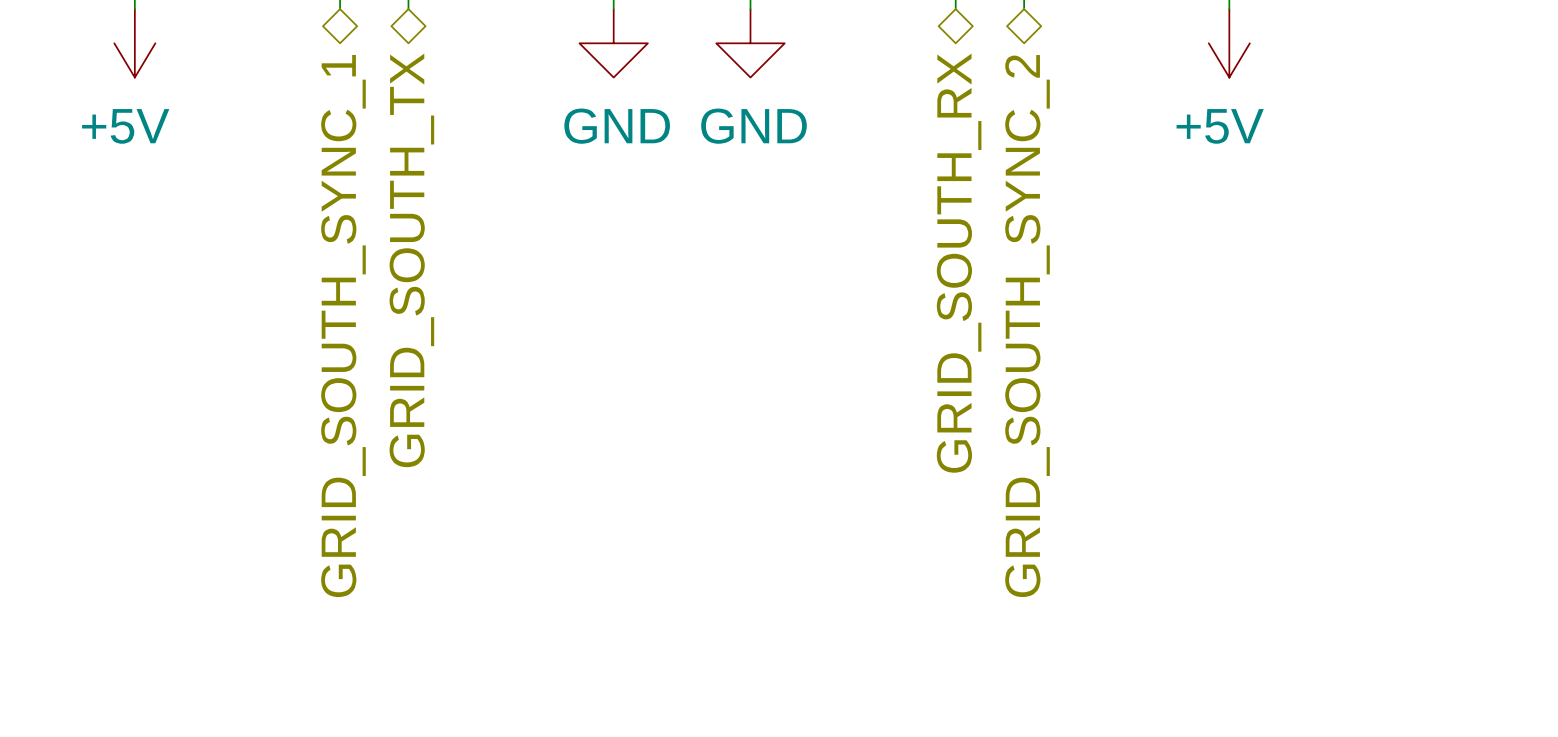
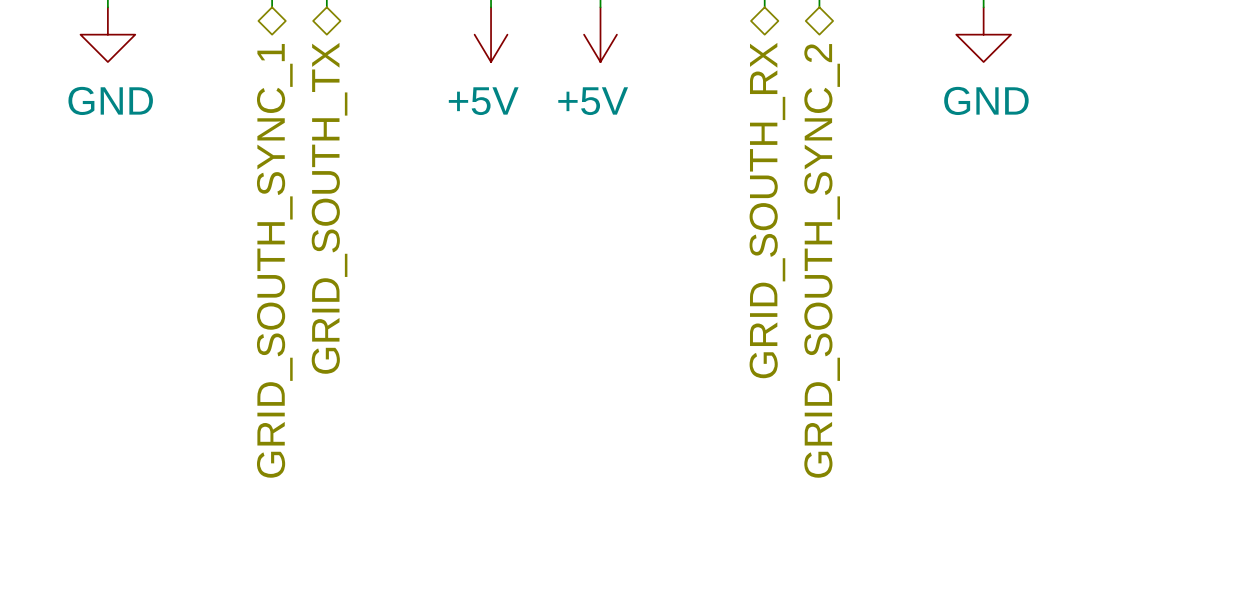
power symbol: +5V (134, 43) -> GND (107, 34)
power symbol: GND (613, 43) -> +5V (491, 34)
power symbol: GND (750, 43) -> +5V (600, 34)
power symbol: +5V (1229, 43) -> GND (983, 34)

